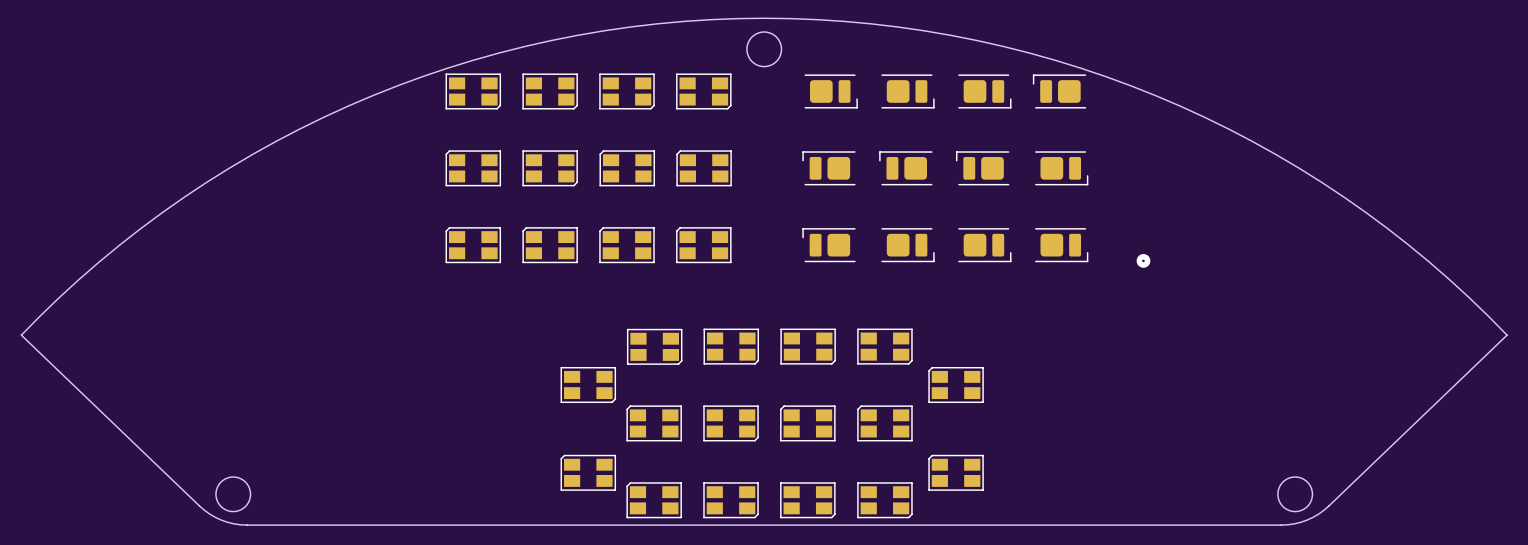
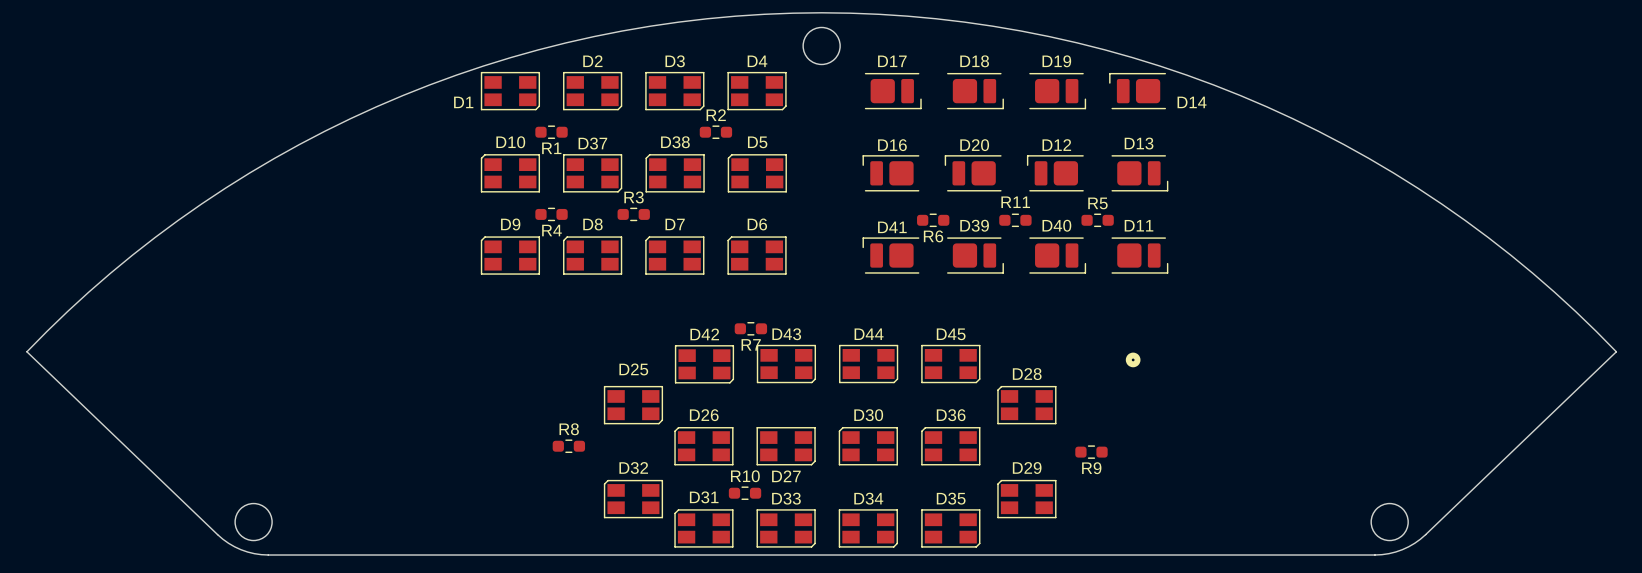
D2 name: none -> D2 (592, 61)
D3 name: none -> D3 (675, 61)
D4 name: none -> D4 (757, 61)
D17 name: none -> D17 (892, 61)
D18 name: none -> D18 (974, 61)
D19 name: none -> D19 (1056, 61)
D1 name: none -> D1 (463, 102)
D14 name: none -> D14 (1192, 102)
R1: none -> (551, 132)
R2: none -> (715, 132)
D10 name: none -> D10 (510, 142)
D38 name: none -> D38 (675, 142)
D5 name: none -> D5 (757, 142)
D37 name: none -> D37 (592, 143)
D13 name: none -> D13 (1139, 143)
D12 name: none -> D12 (1056, 145)
D16 name: none -> D16 (892, 145)
D20 name: none -> D20 (974, 145)
R4: none -> (551, 214)
R3: none -> (633, 214)
R6: none -> (933, 220)
R11: none -> (1015, 220)
R5: none -> (1097, 220)
D9 name: none -> D9 (510, 224)
D8 name: none -> D8 (592, 224)
D7 name: none -> D7 (675, 224)
D6 name: none -> D6 (757, 224)
D39 name: none -> D39 (974, 225)
D40 name: none -> D40 (1056, 225)
D11 name: none -> D11 (1139, 225)
D41 name: none -> D41 (892, 227)
part position: (1143, 260) -> (1133, 359)
R7: none -> (750, 328)
D42 name: none -> D42 (704, 334)
D43 name: none -> D43 (786, 334)
D44 name: none -> D44 (869, 334)
D45 name: none -> D45 (951, 334)
D25 name: none -> D25 (633, 369)
D28 name: none -> D28 (1027, 374)
D26 name: none -> D26 (704, 415)
D30 name: none -> D30 (868, 415)
D36 name: none -> D36 (951, 415)
R8: none -> (568, 446)
R9: none -> (1091, 452)
D32 name: none -> D32 (633, 468)
D29 name: none -> D29 (1027, 468)
D27 name: none -> D27 (786, 476)
R10: none -> (745, 493)
D31 name: none -> D31 (704, 497)
D33 name: none -> D33 (786, 498)
D34 name: none -> D34 (868, 498)
D35 name: none -> D35 (951, 498)

